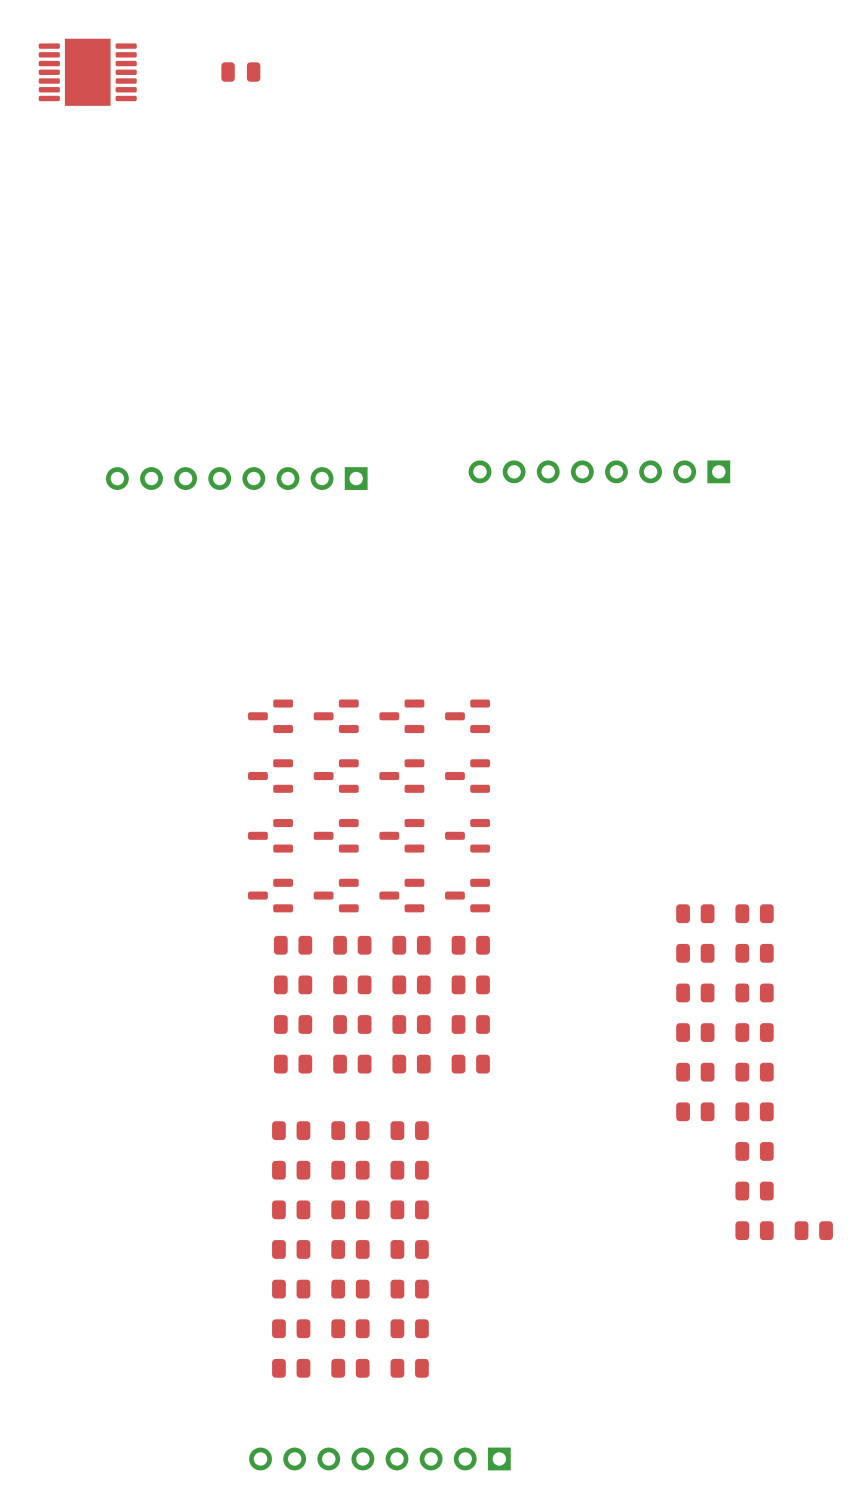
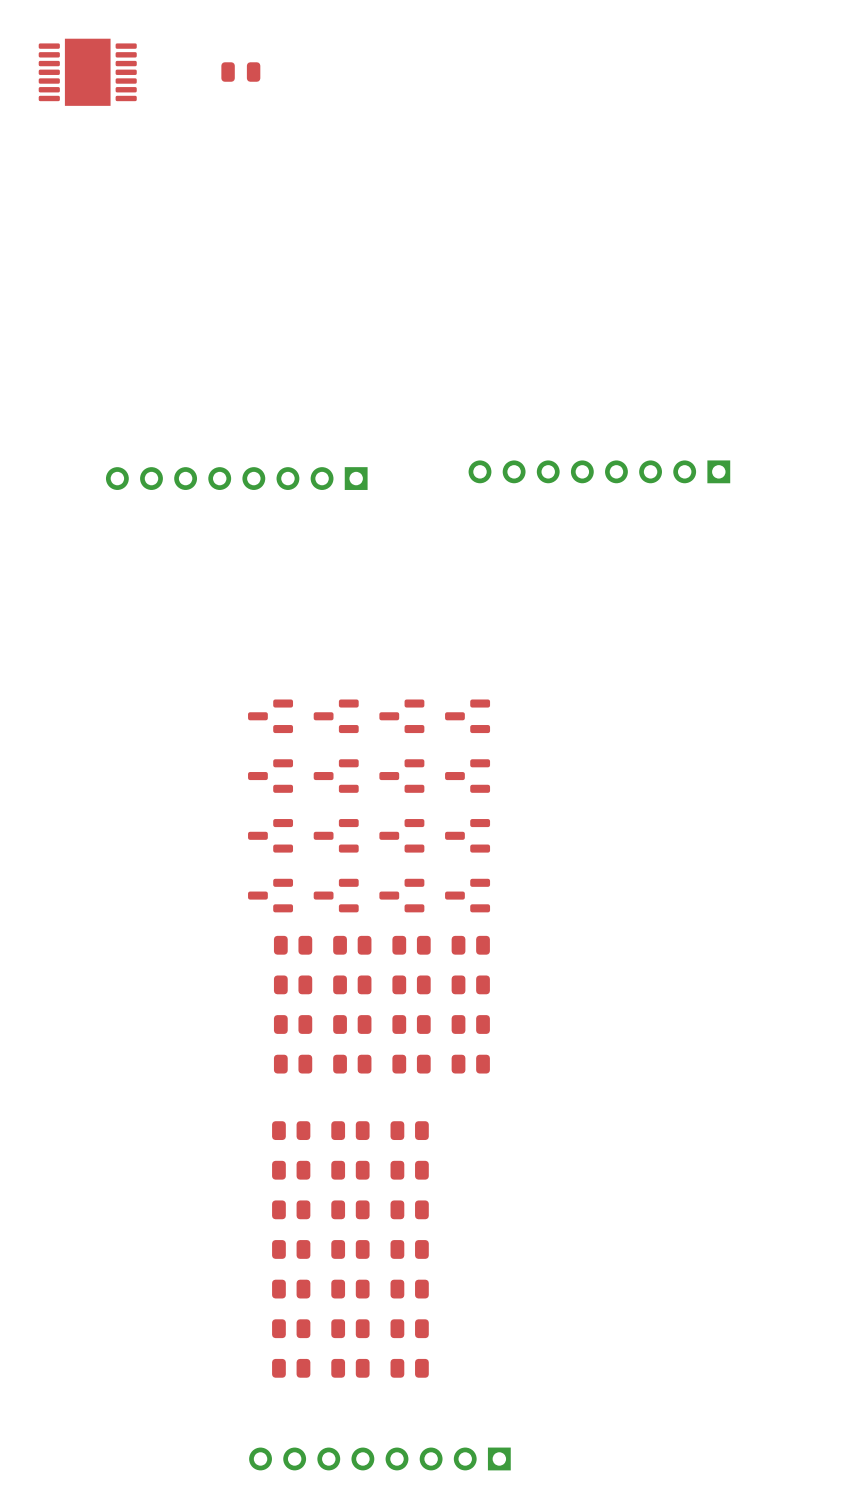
part: (695, 913) -> none
part: (754, 913) -> none
part: (695, 953) -> none
part: (754, 953) -> none
part: (695, 992) -> none
part: (754, 992) -> none
part: (695, 1032) -> none
part: (754, 1032) -> none
part: (695, 1072) -> none
part: (754, 1072) -> none
part: (695, 1111) -> none
part: (754, 1111) -> none
part: (754, 1151) -> none
part: (754, 1191) -> none
part: (754, 1230) -> none
part: (813, 1230) -> none

